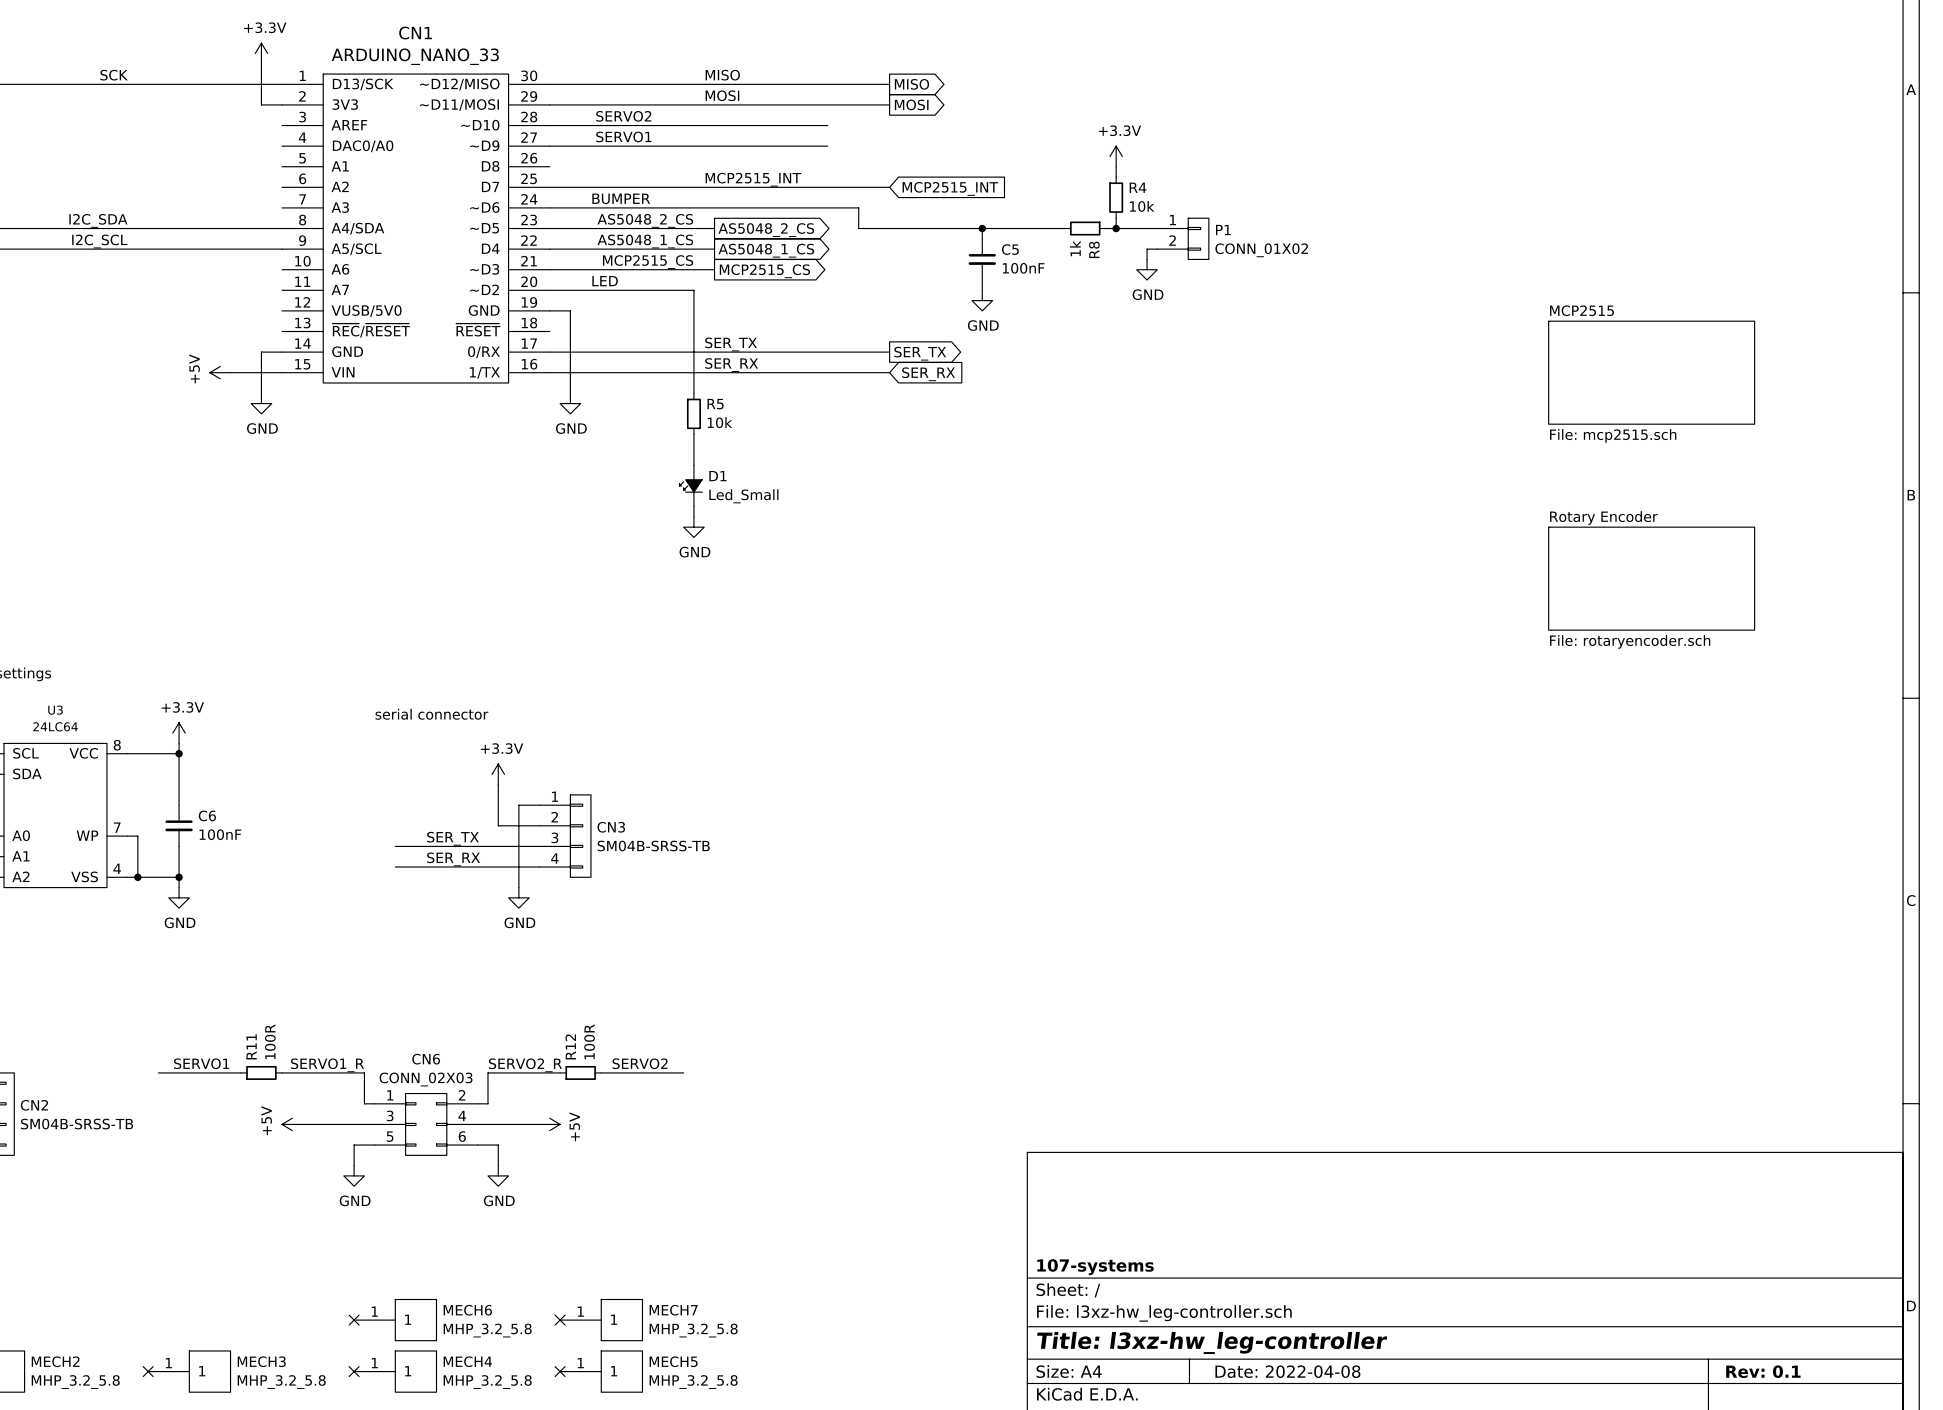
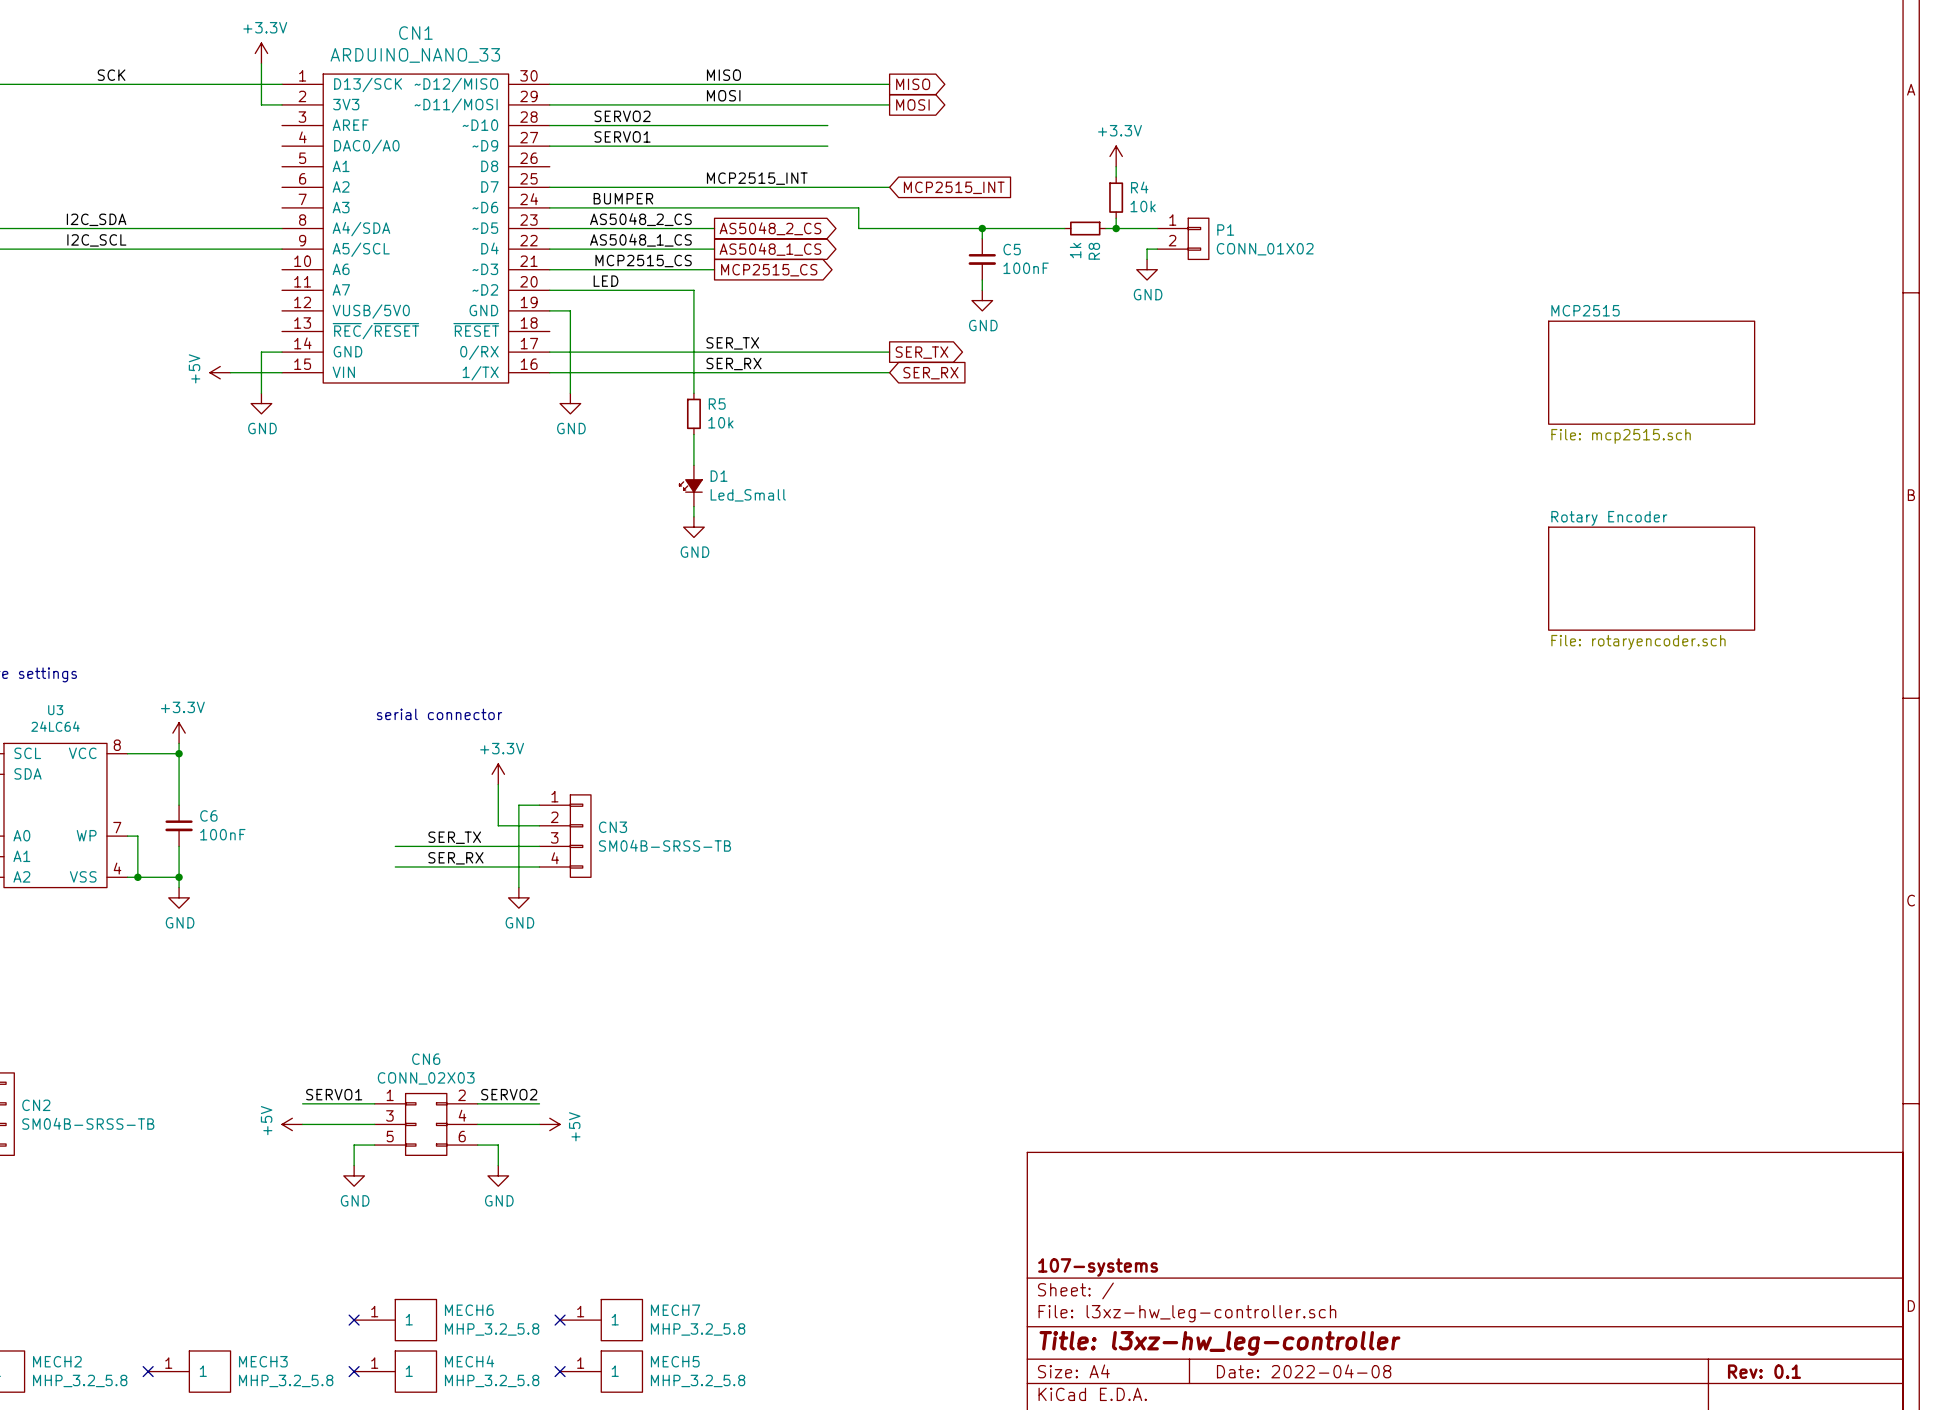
label position: SERVO1 (201, 1063) -> SERVO1 (334, 1094)
label position: SERVO2 (640, 1063) -> SERVO2 (509, 1094)
label: SERVO1_R (327, 1065) -> none
label: SERVO2_R (525, 1065) -> none
wire: (158, 1072) (240, 1072) -> none
R11: 100R (261, 1072) -> none
wire: (282, 1072) (364, 1072) (364, 1103) -> (302, 1103) (364, 1103)
wire: (560, 1072) (487, 1072) (487, 1103) -> (539, 1103) (487, 1103)
R12: 100R (580, 1072) -> none
wire: (601, 1072) (683, 1072) -> none

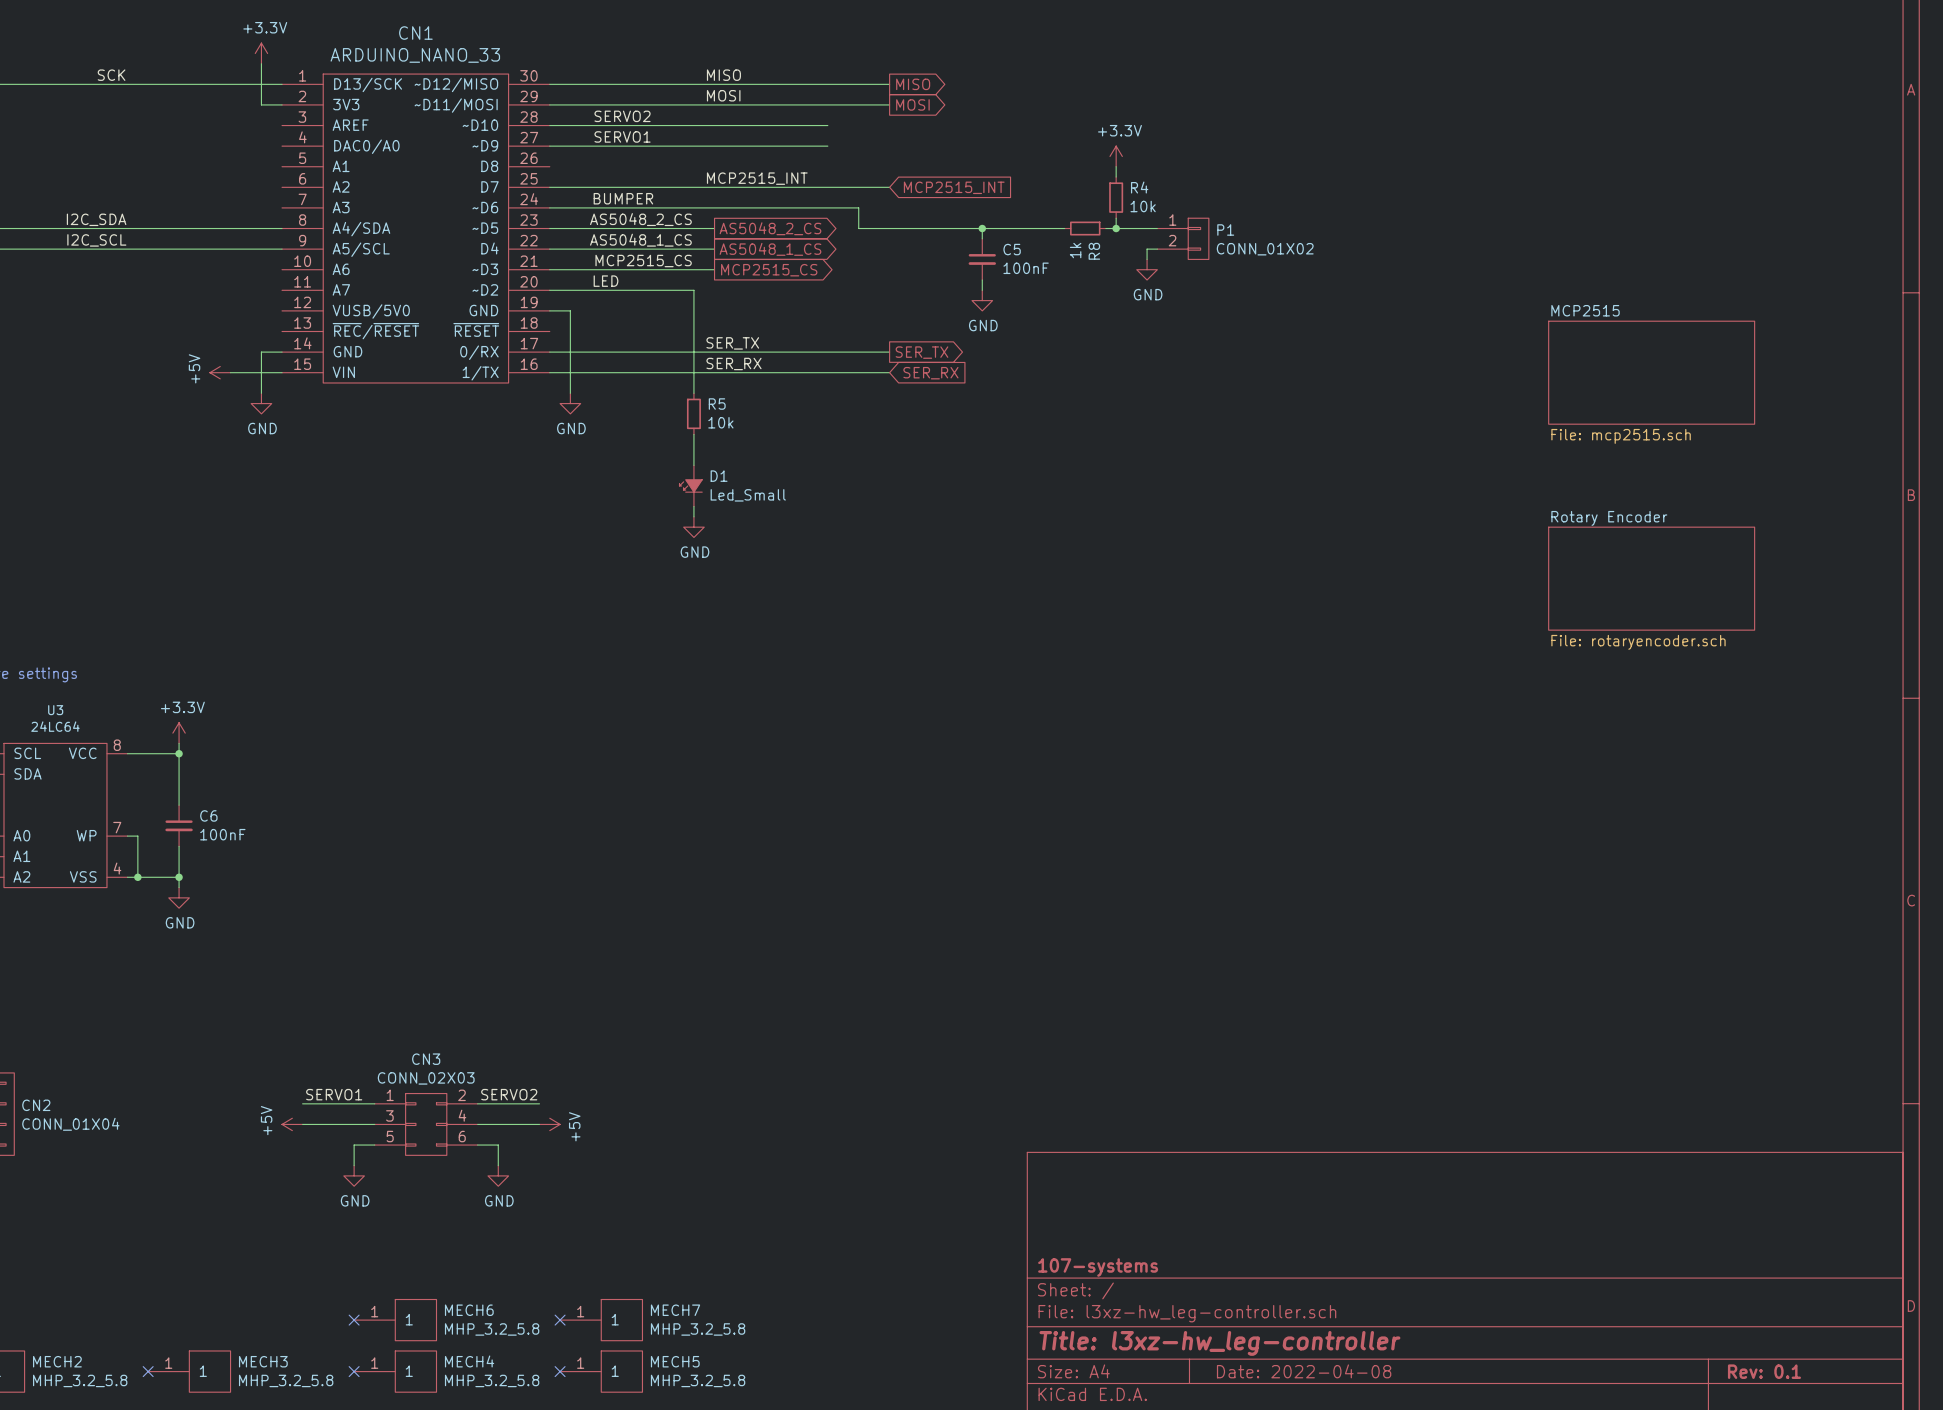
text: serial connector (439, 714) -> none
power symbol: +3.3V (498, 774) -> none
wire: (498, 784) (498, 825) (539, 825) -> none
wire: (539, 805) (518, 805) (518, 887) -> none
CN3: SM04B-SRSS-TB (565, 836) -> none
label: SER_TX (454, 837) -> none
wire: (395, 846) (539, 846) -> none
label: SER_RX (455, 858) -> none
wire: (395, 866) (539, 866) -> none
power symbol: GND (518, 897) -> none
CN6 name: CN6 (426, 1059) -> CN3 (426, 1059)
CN2 value: SM04B-SRSS-TB (88, 1123) -> CONN_01X04 (70, 1124)

